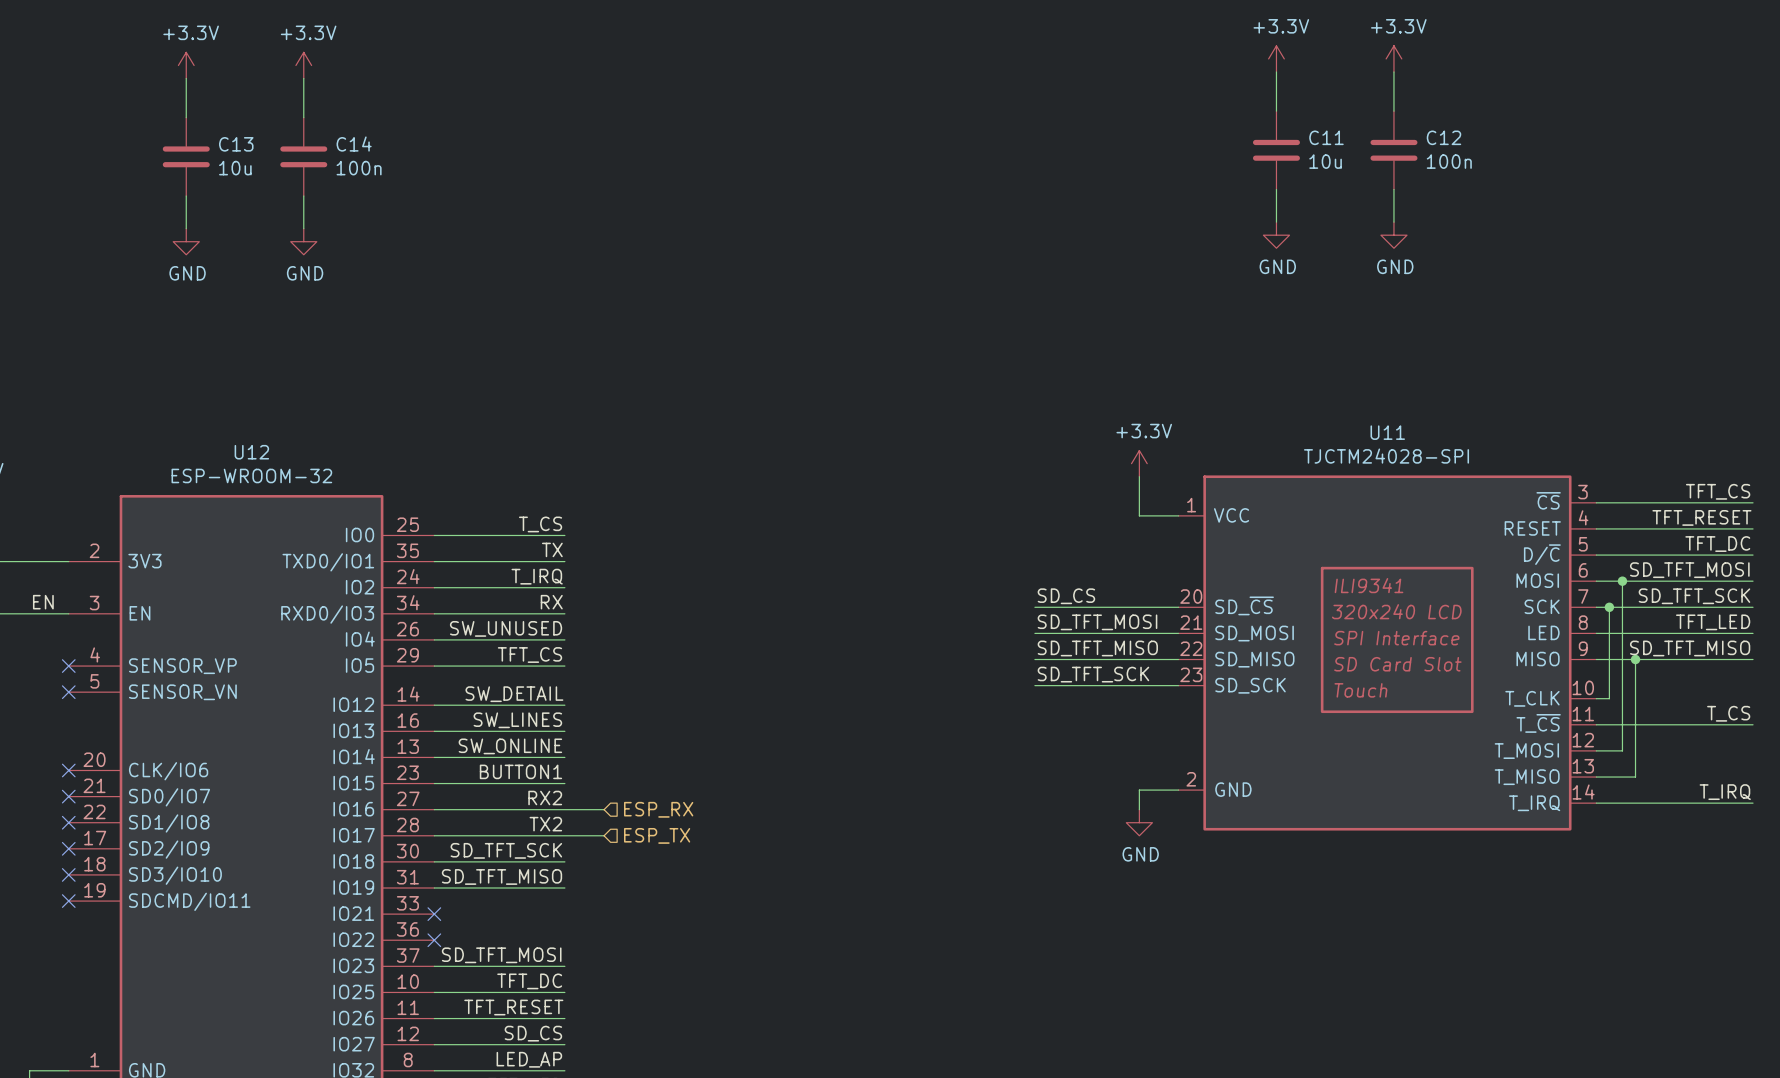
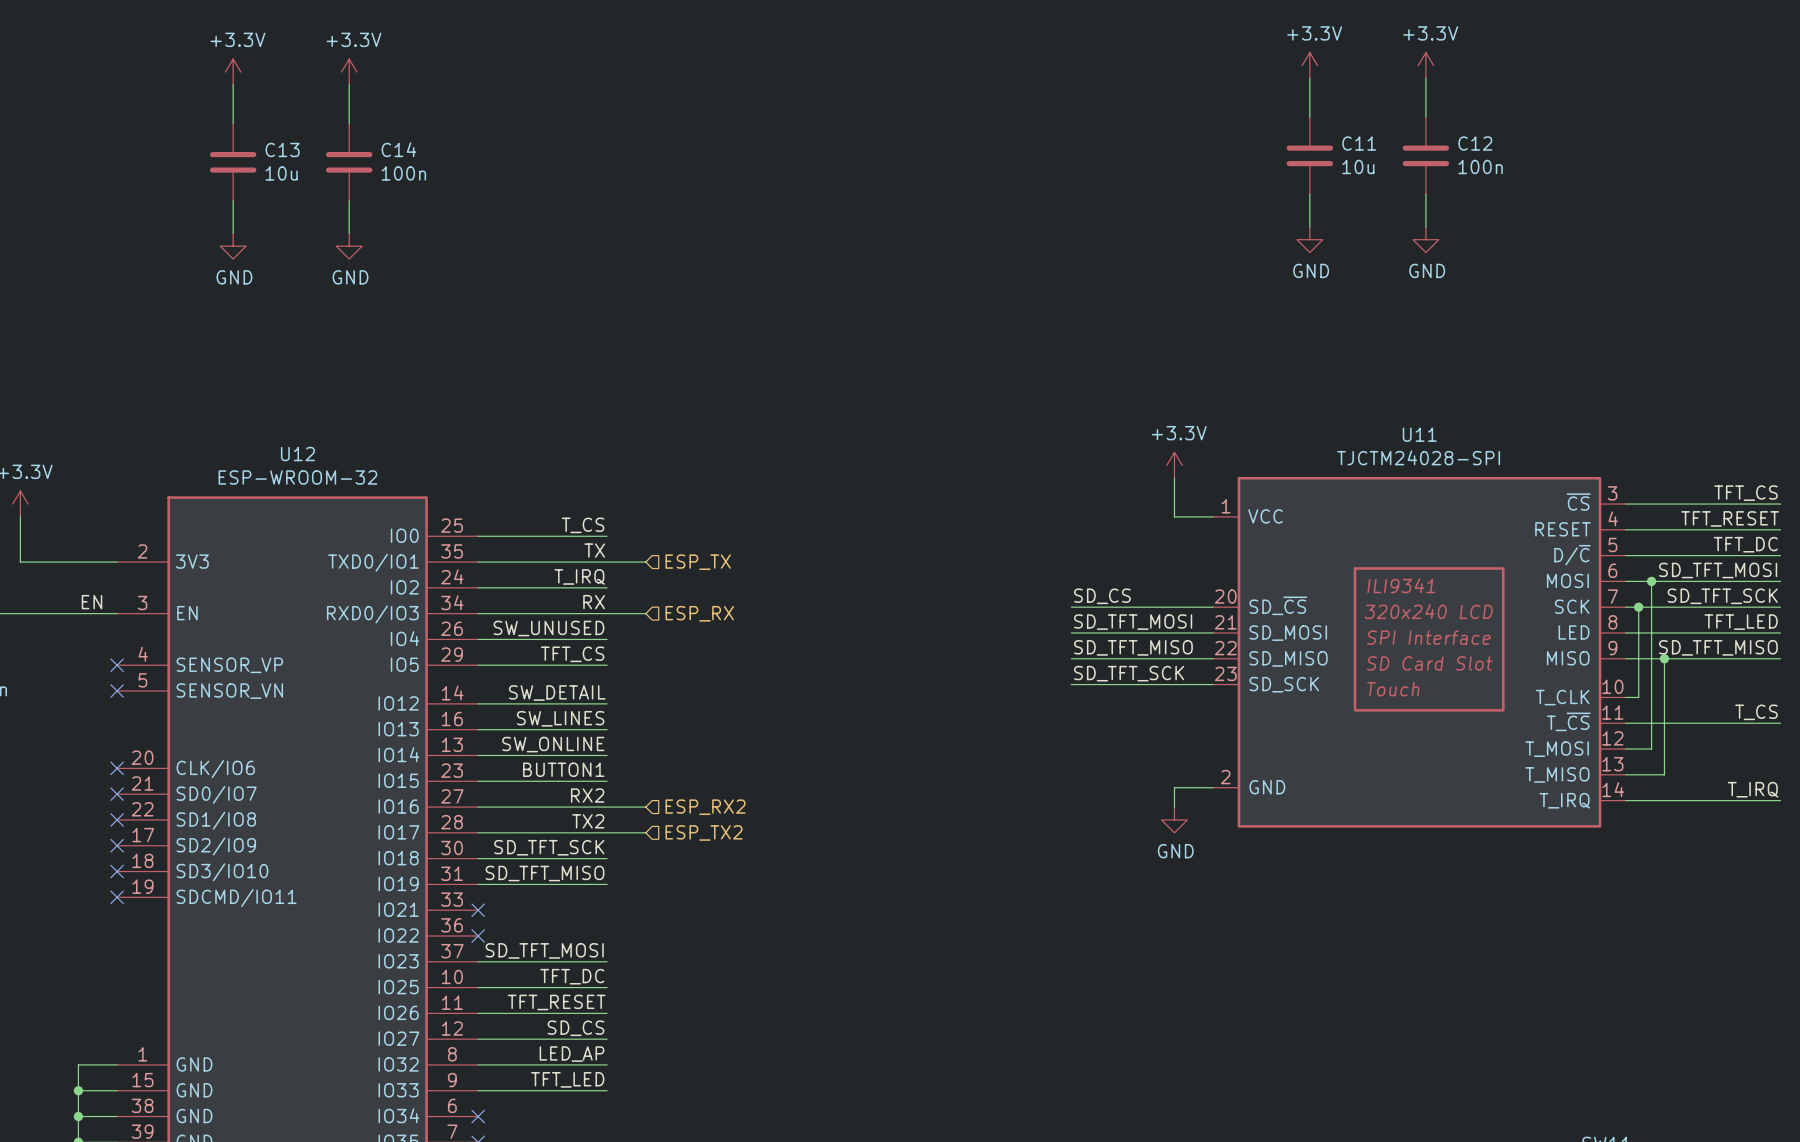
wire: none -> (607, 562) (645, 562)
hierarchical label: none -> ESP_TX (698, 562)
wire: none -> (607, 613) (645, 613)
hierarchical label: none -> ESP_RX (699, 613)
hierarchical label: ESP_RX (658, 809) -> ESP_RX2 (705, 807)
hierarchical label: ESP_TX (657, 835) -> ESP_TX2 (704, 832)

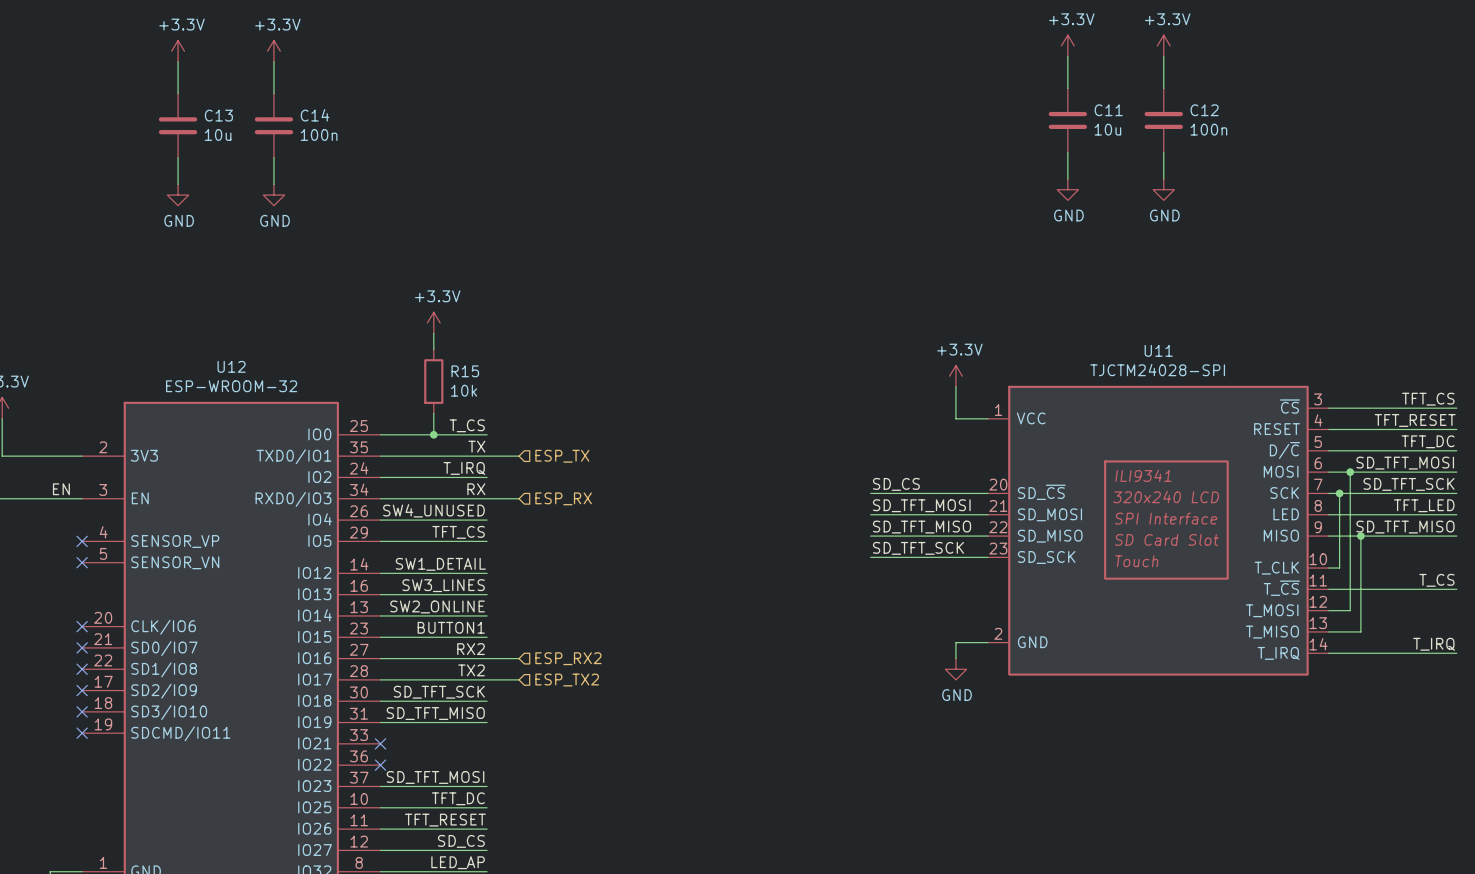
power symbol: none -> +3.3V (433, 322)
wire: none -> (433, 333) (433, 349)
R15: none -> 10k (433, 381)
wire: none -> (433, 413) (433, 434)
junction: none -> (433, 434)
label: SW_UNUSED (548, 628) -> SW4_UNUSED (433, 510)
label: SW_DETAIL (557, 693) -> SW1_DETAIL (440, 564)
label: SW_LINES (560, 718) -> SW3_LINES (443, 585)
label: SW_ONLINE (553, 744) -> SW2_ONLINE (437, 606)

